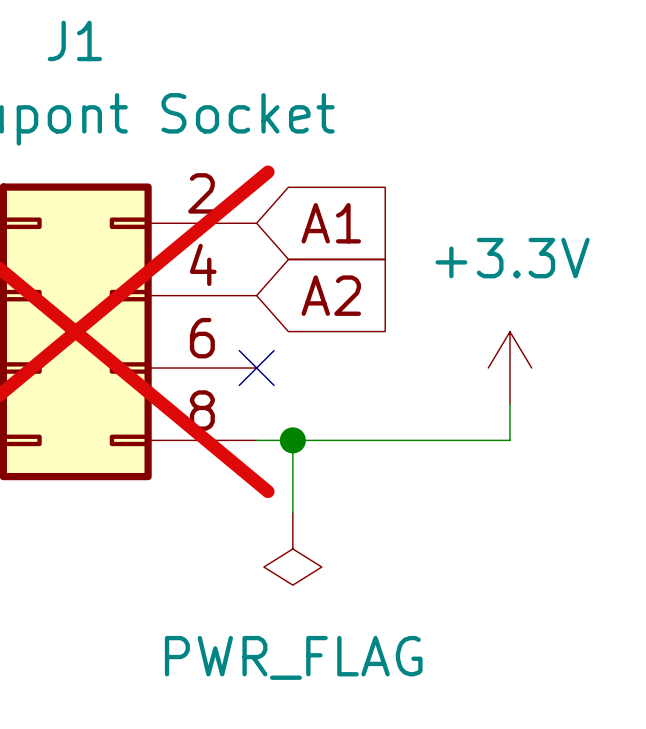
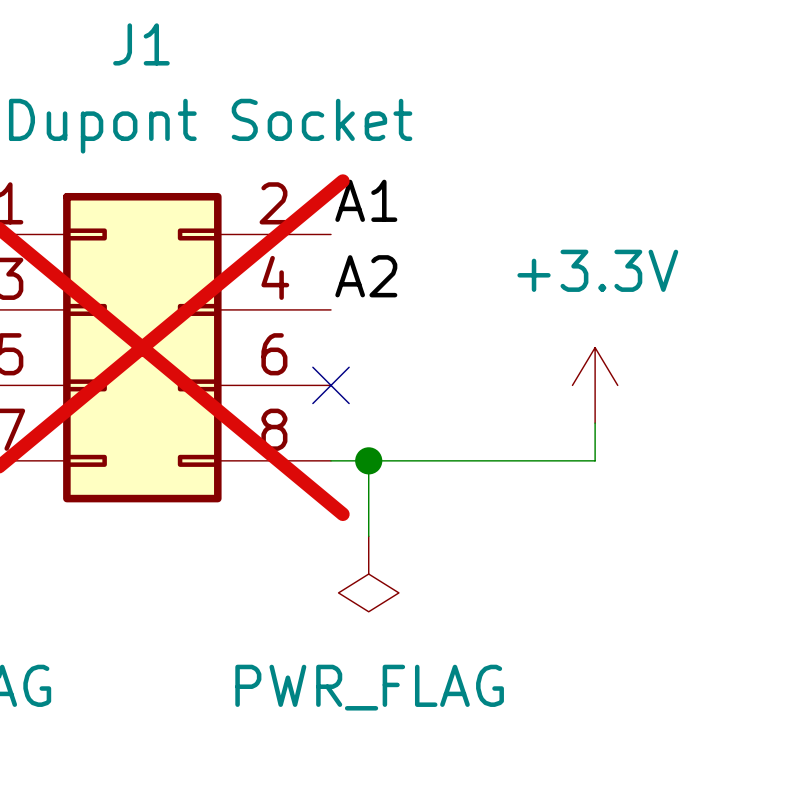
label: none -> A1 (366, 200)
global label: A1 (331, 223) -> none
label: none -> A2 (366, 276)
global label: A2 (331, 295) -> none

